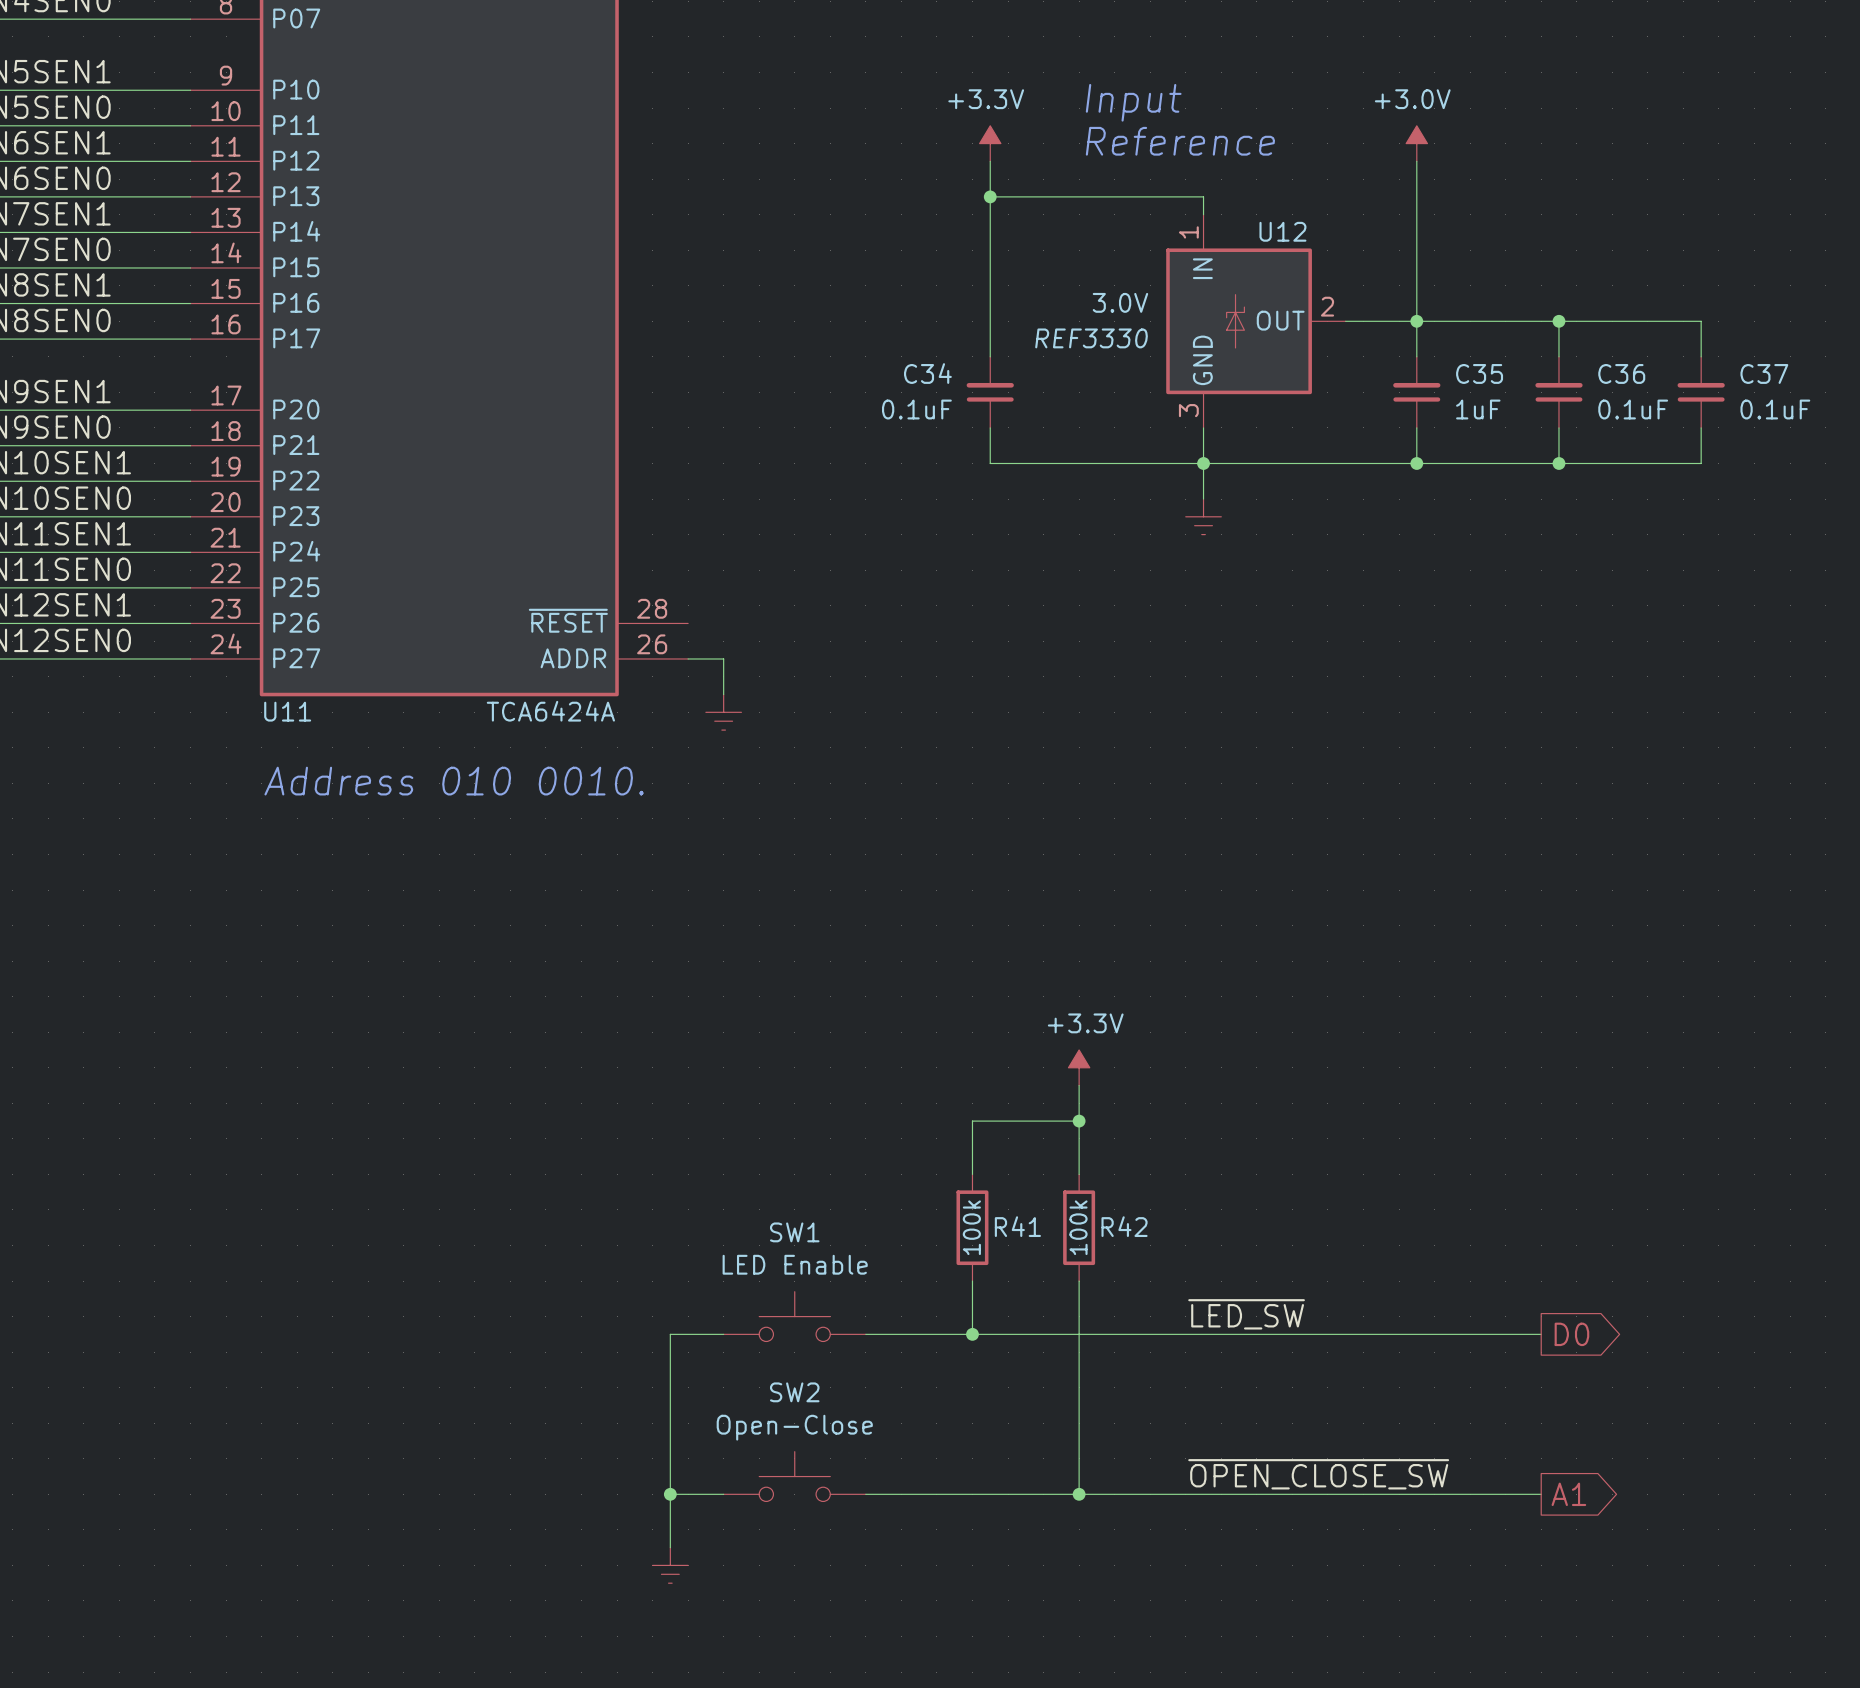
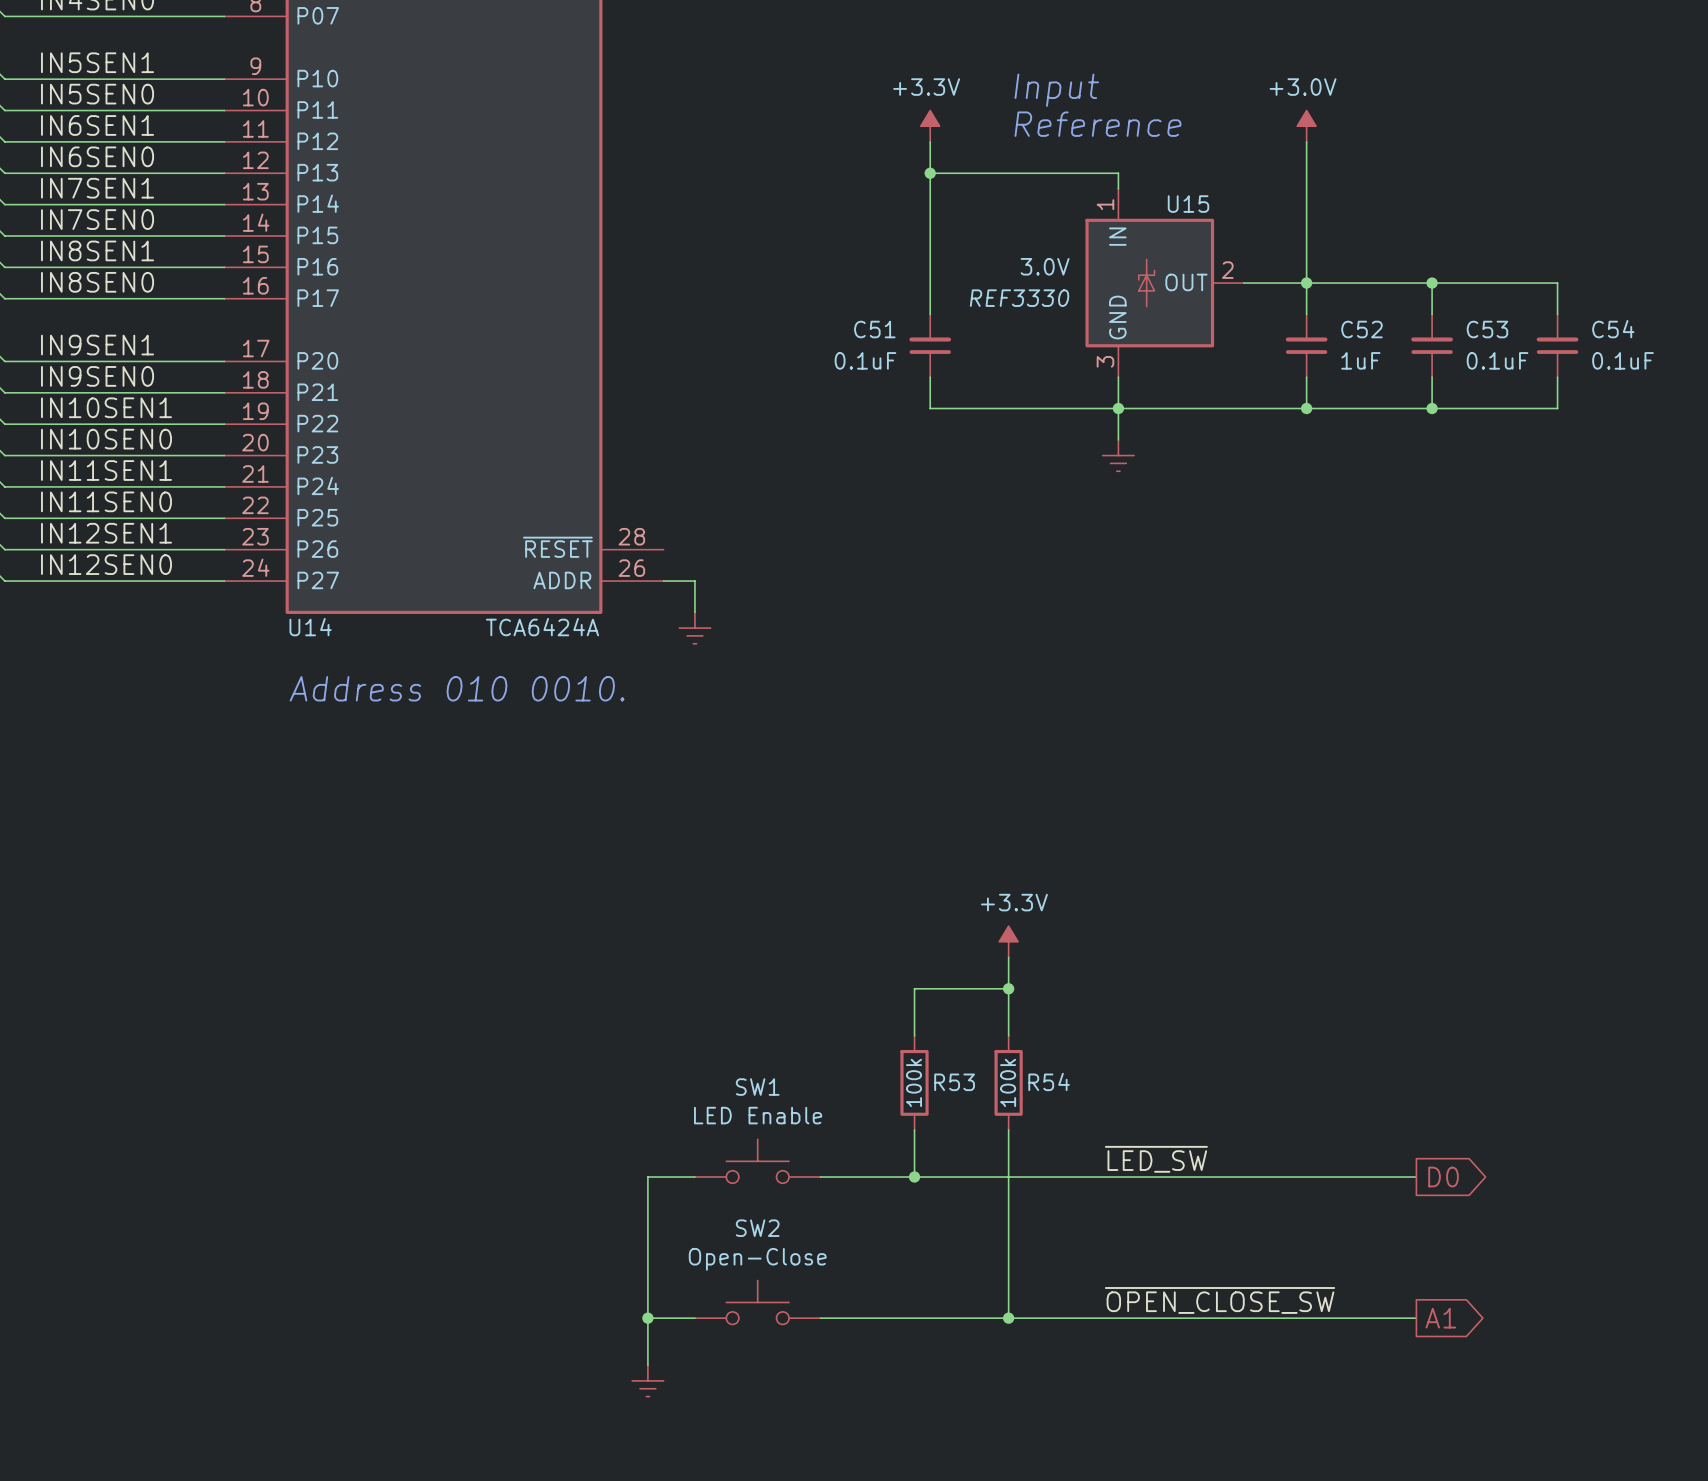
U12 name: U12 (1282, 231) -> U15 (1188, 204)
C34 name: C34 (927, 373) -> C51 (874, 329)
C35 name: C35 (1479, 373) -> C52 (1362, 329)
C36 name: C36 (1621, 373) -> C53 (1487, 329)
C37 name: C37 (1764, 373) -> C54 (1613, 329)
U11 name: U11 (287, 711) -> U14 (310, 627)
R41 name: R41 (1017, 1226) -> R53 (954, 1082)
R42 name: R42 (1124, 1226) -> R54 (1049, 1081)

